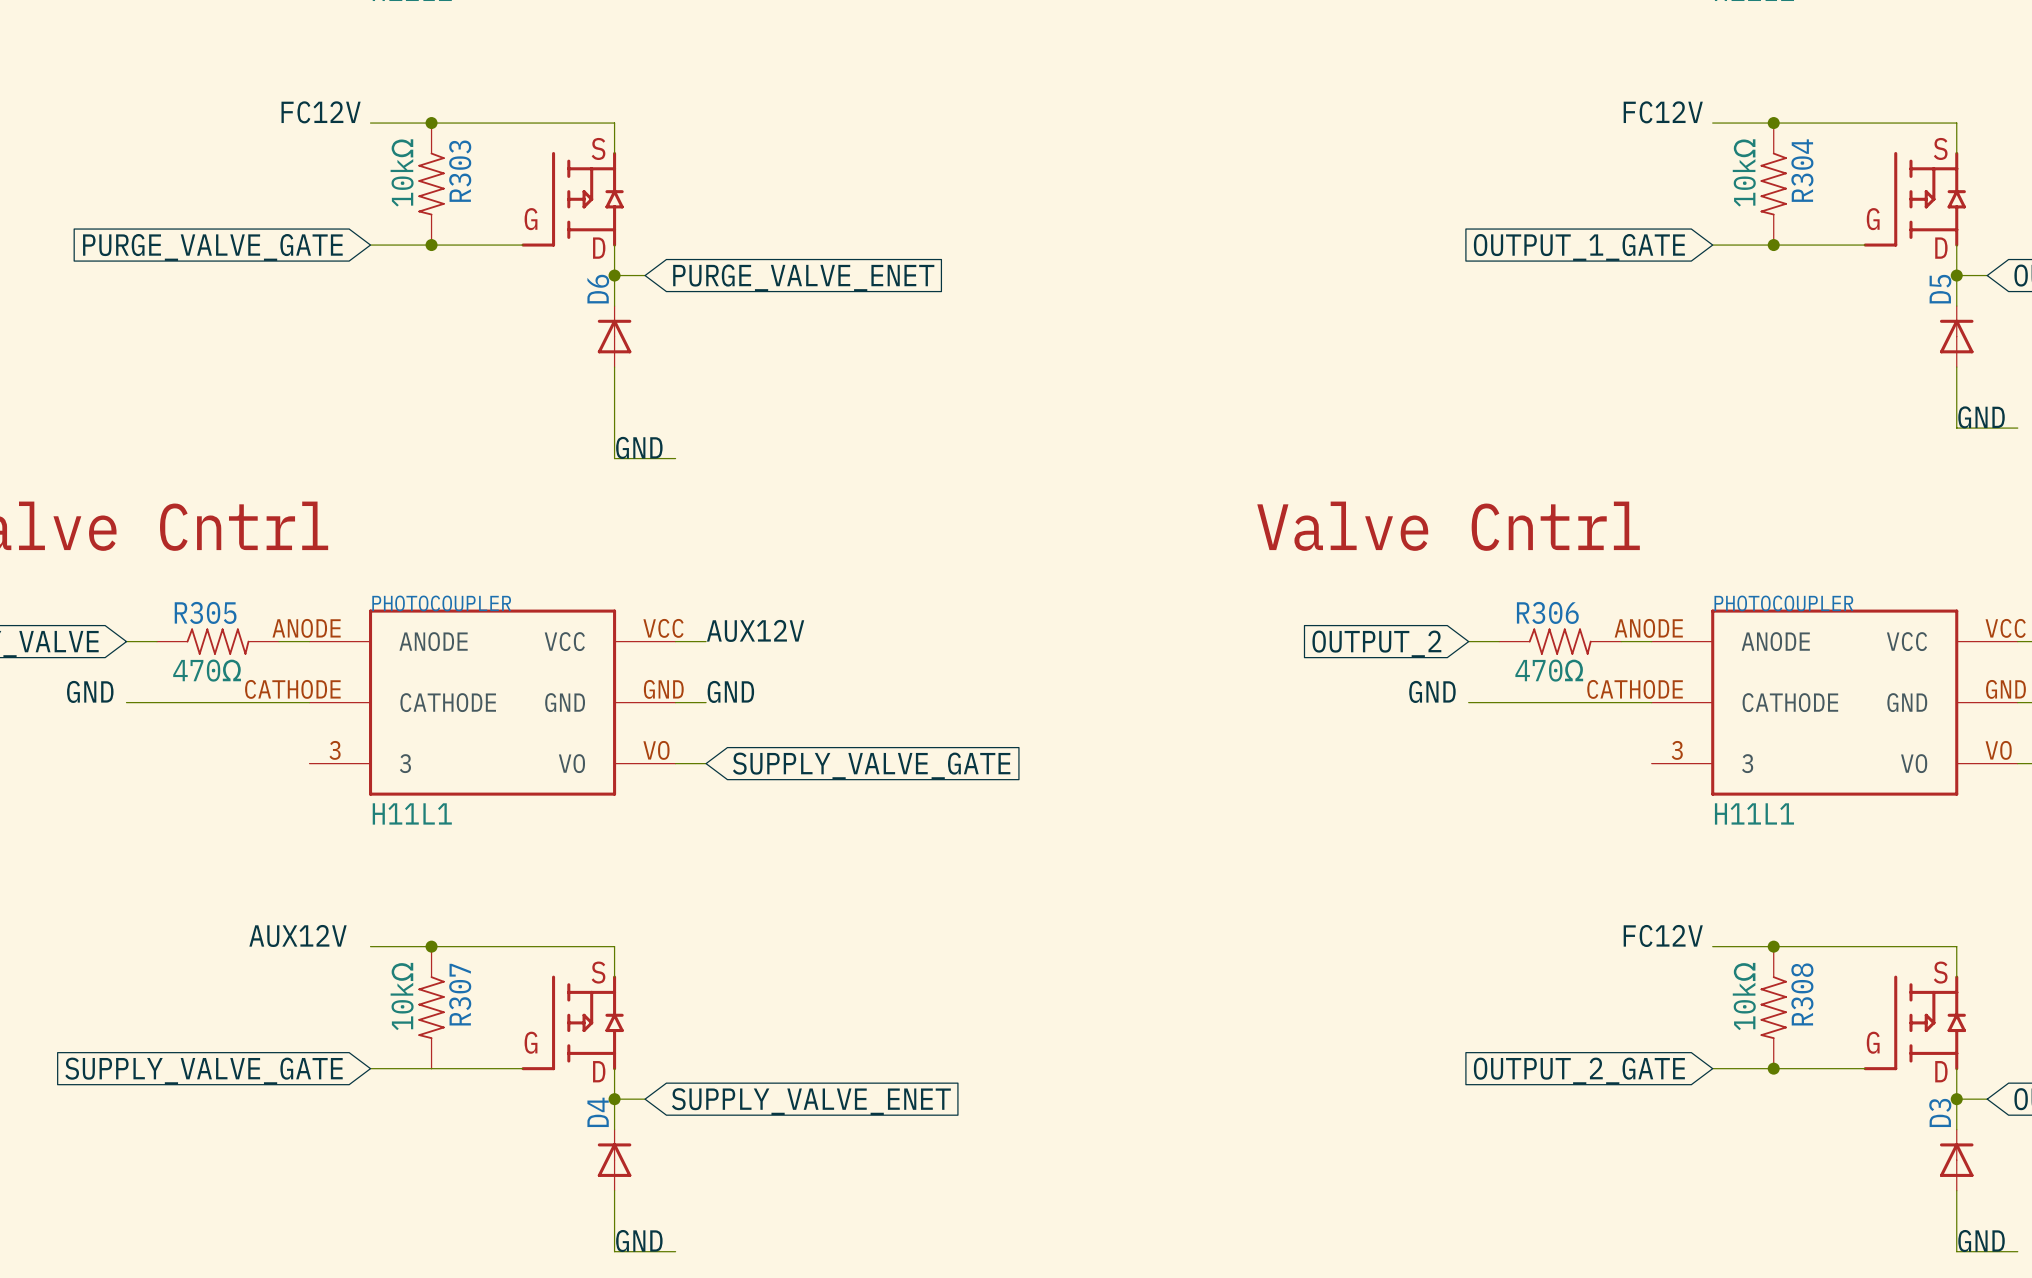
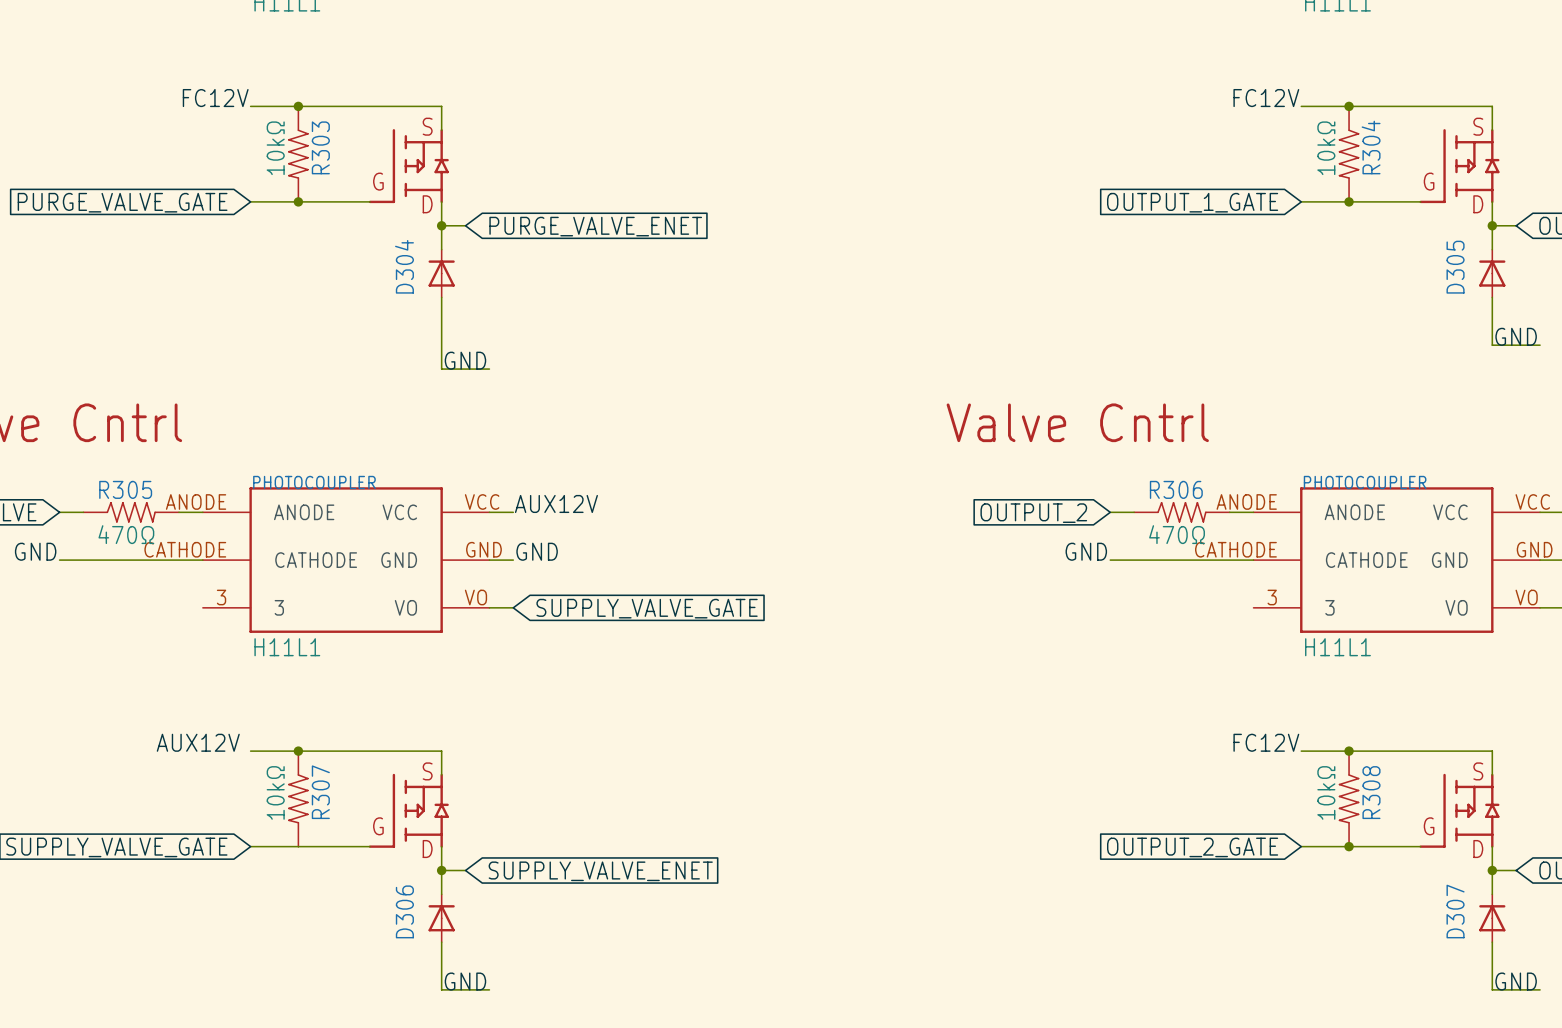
D6 name: D6 (598, 289) -> D304 (404, 266)
D5 name: D5 (1940, 289) -> D305 (1455, 267)
D4 name: D4 (598, 1112) -> D306 (404, 911)
D3 name: D3 (1940, 1112) -> D307 (1455, 911)

